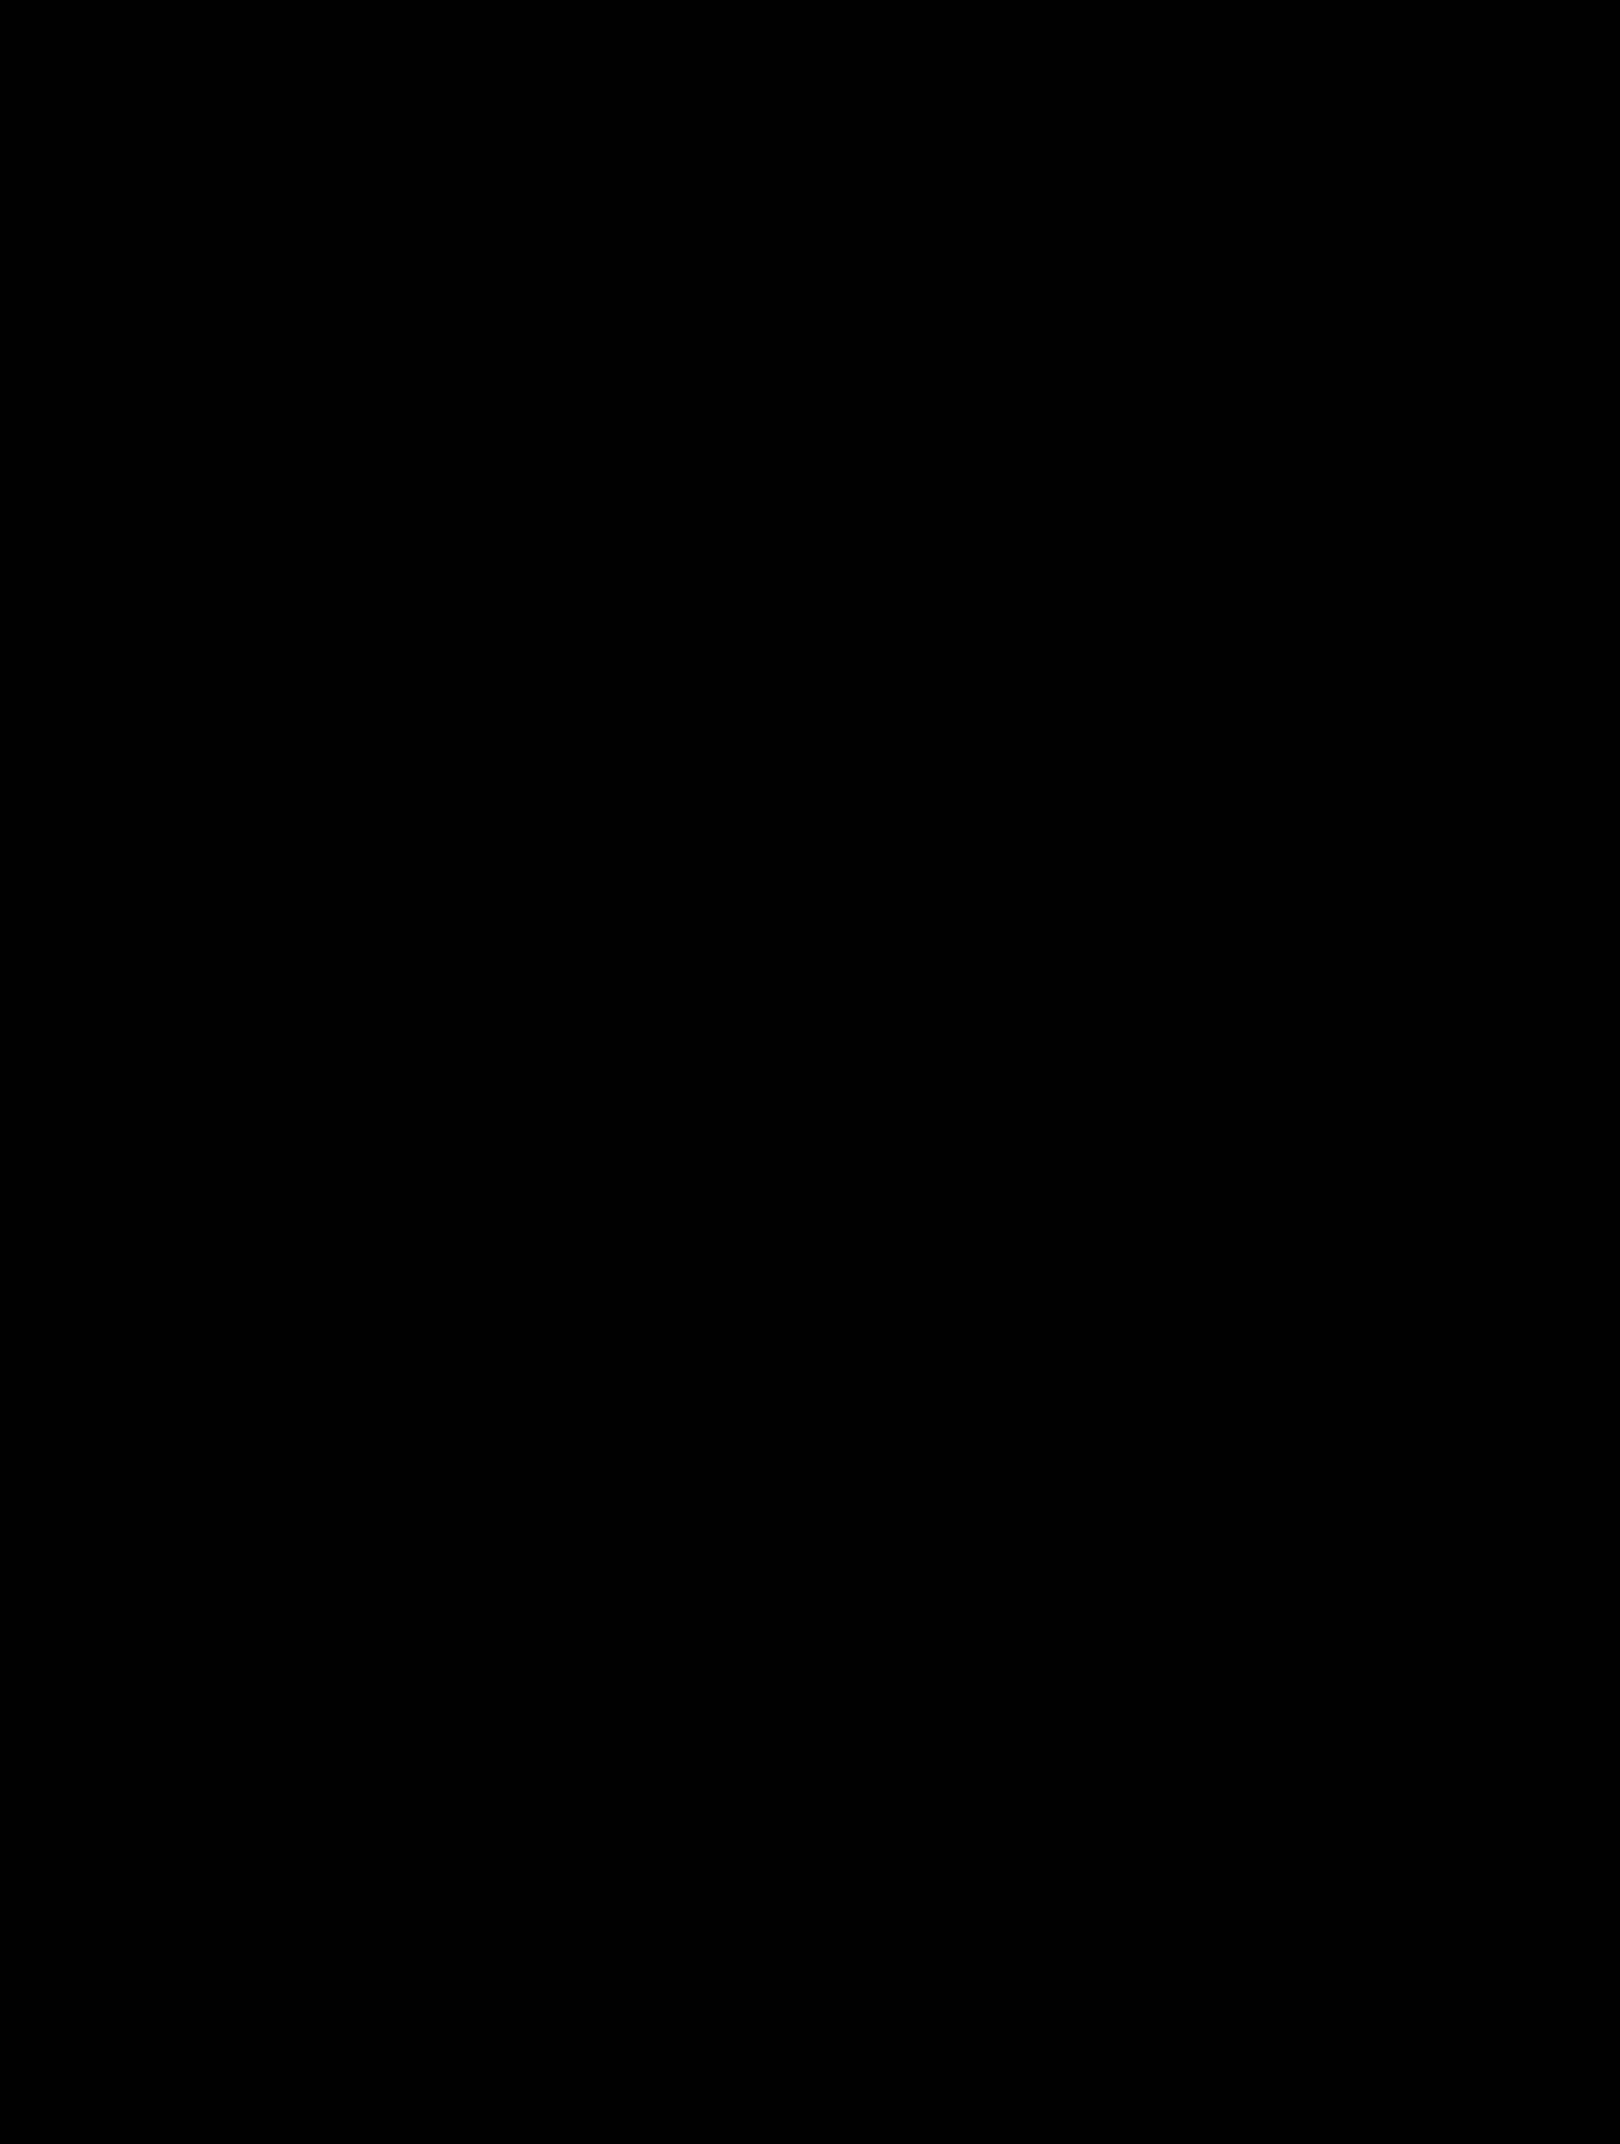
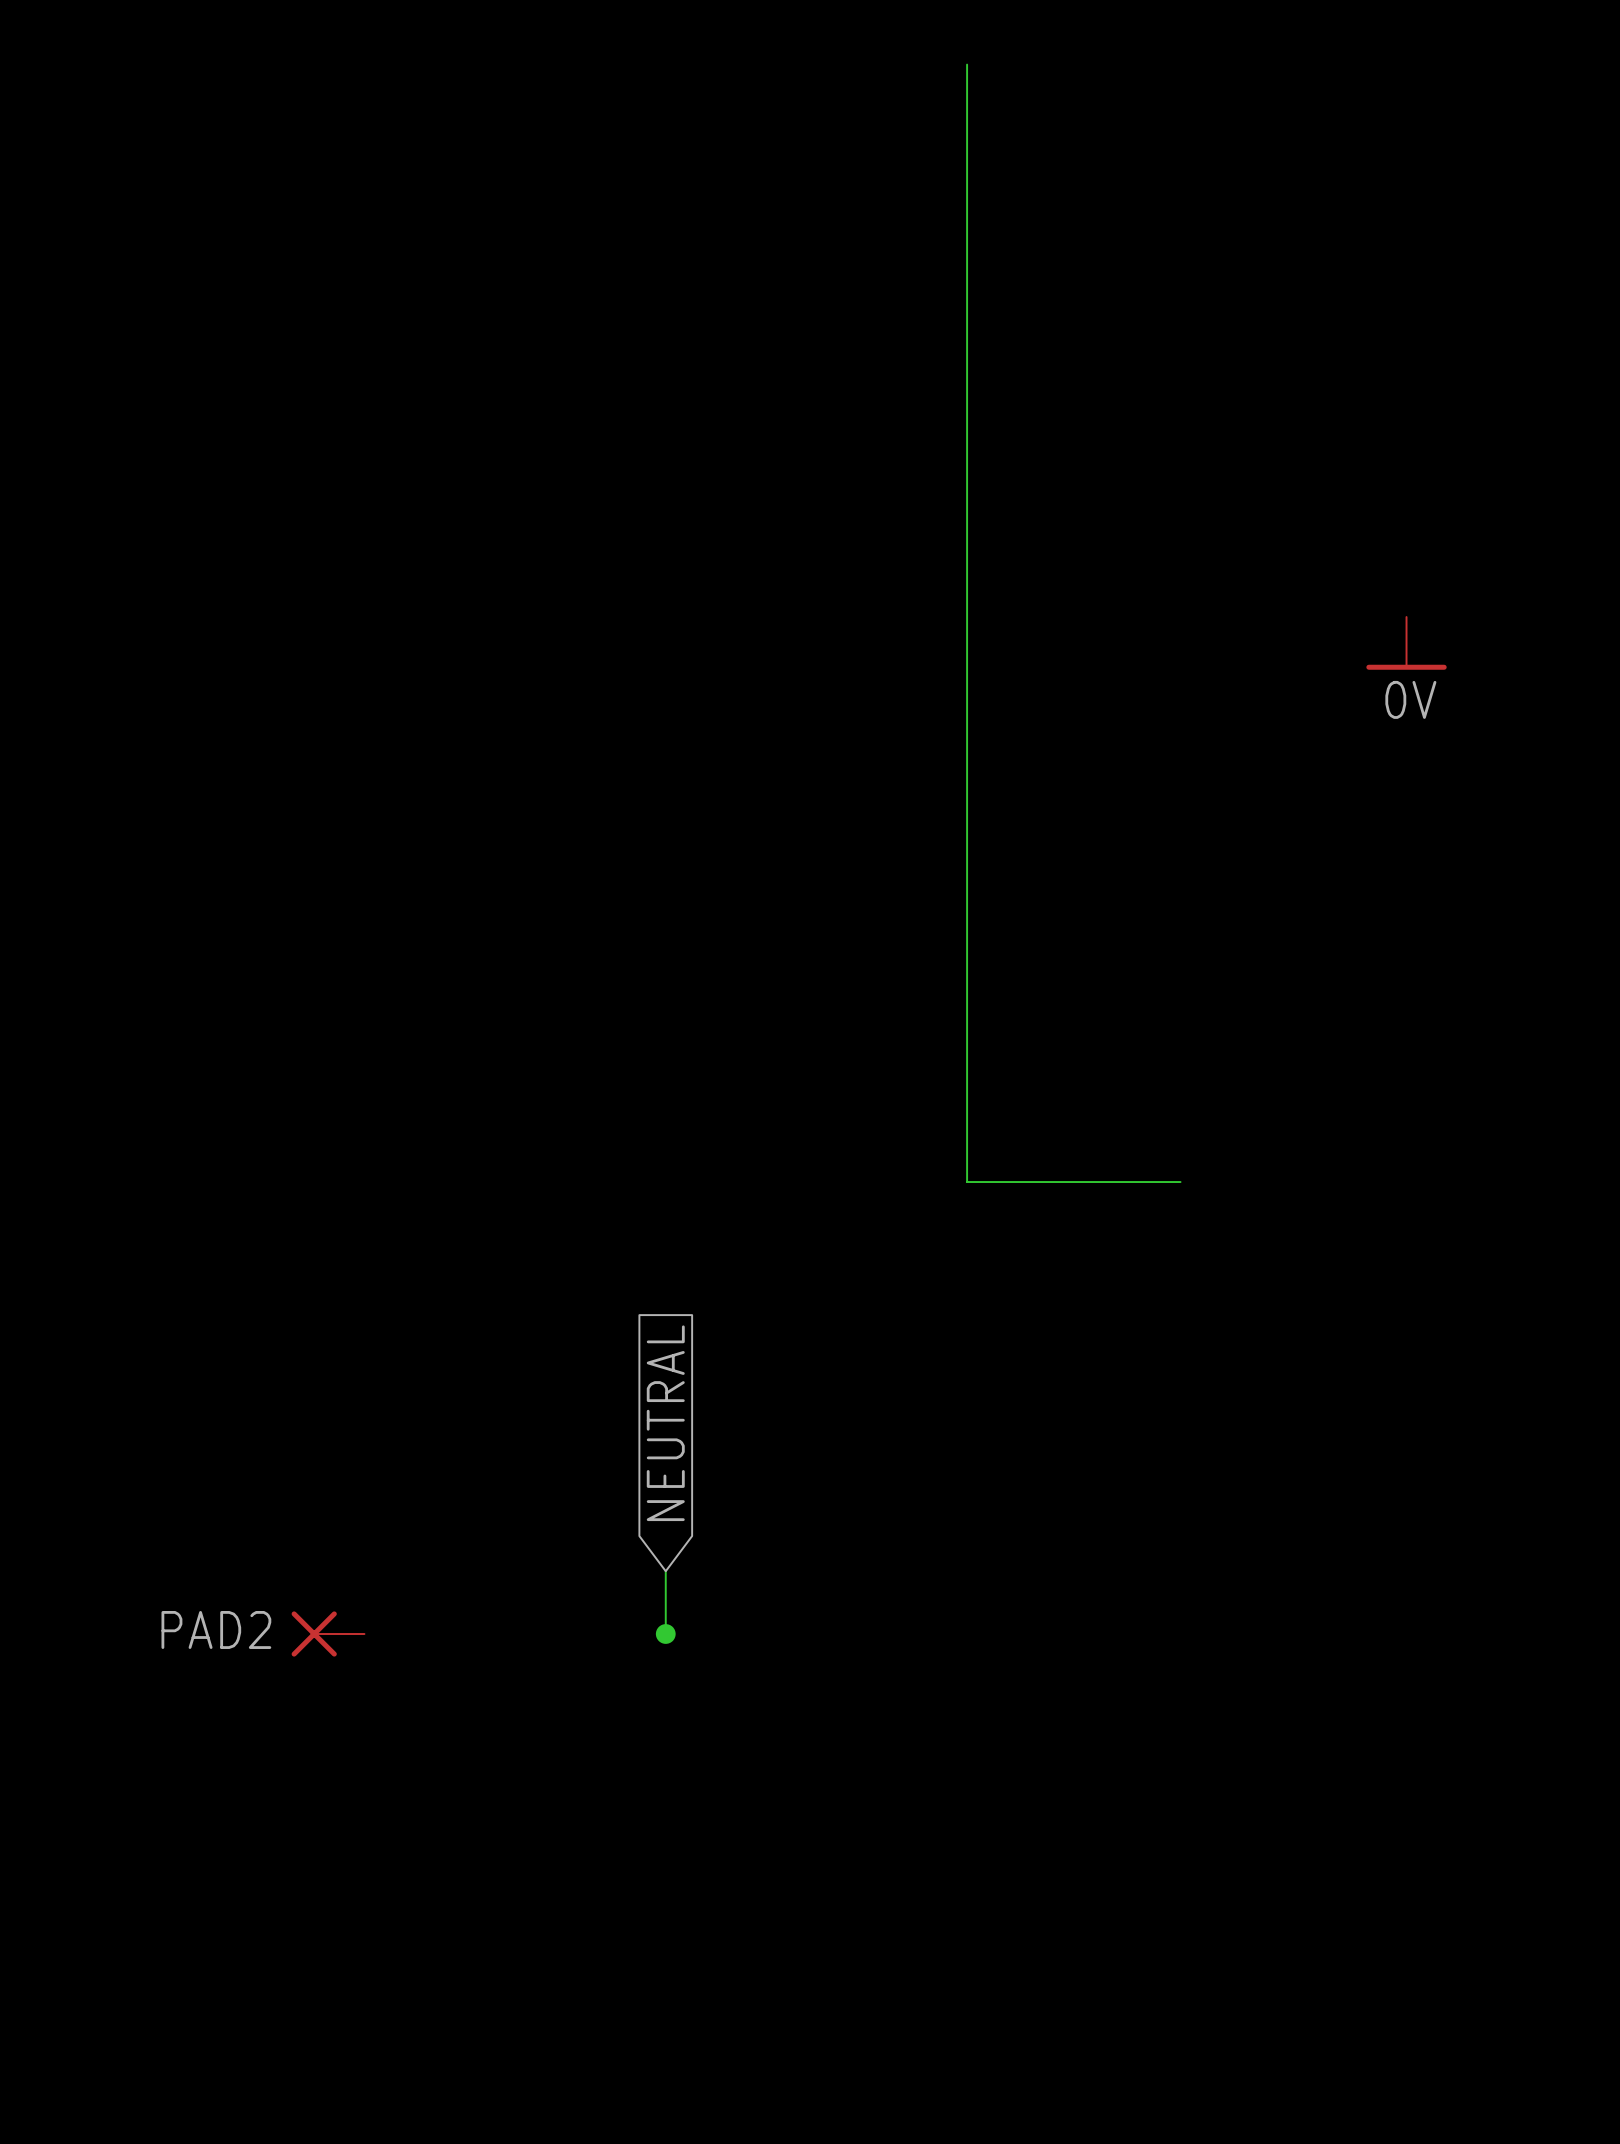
wire: none -> (967, 64) (967, 1182) (1180, 1182)
power symbol: none -> 0V (1406, 643)
global label: none -> NEUTRAL (665, 1423)
wire: none -> (665, 1571) (665, 1634)
PAD2: none -> (328, 1634)
junction: none -> (665, 1634)

